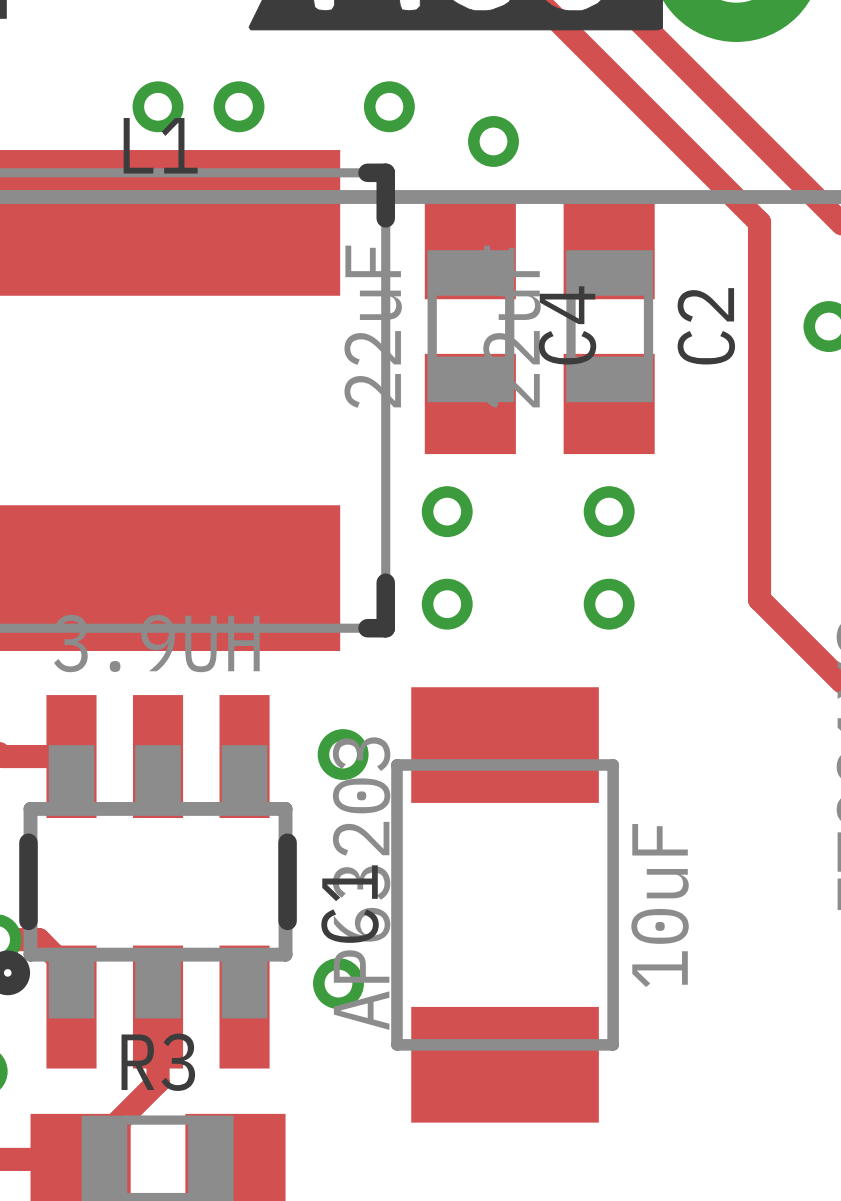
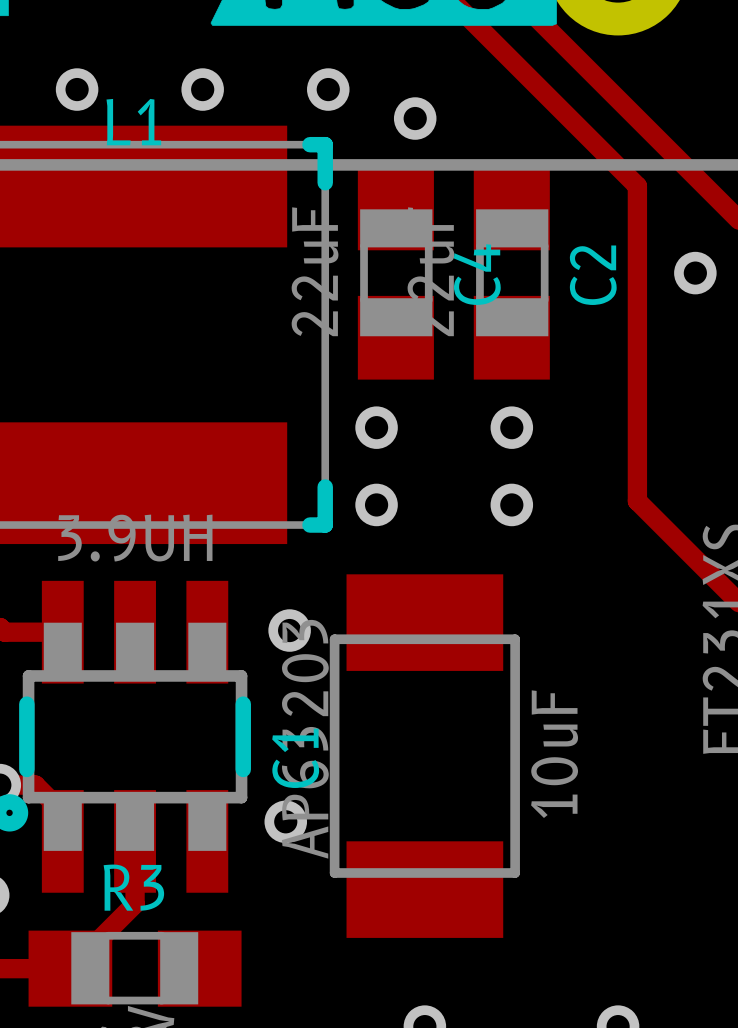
via position: (158, 106) -> (77, 89)

